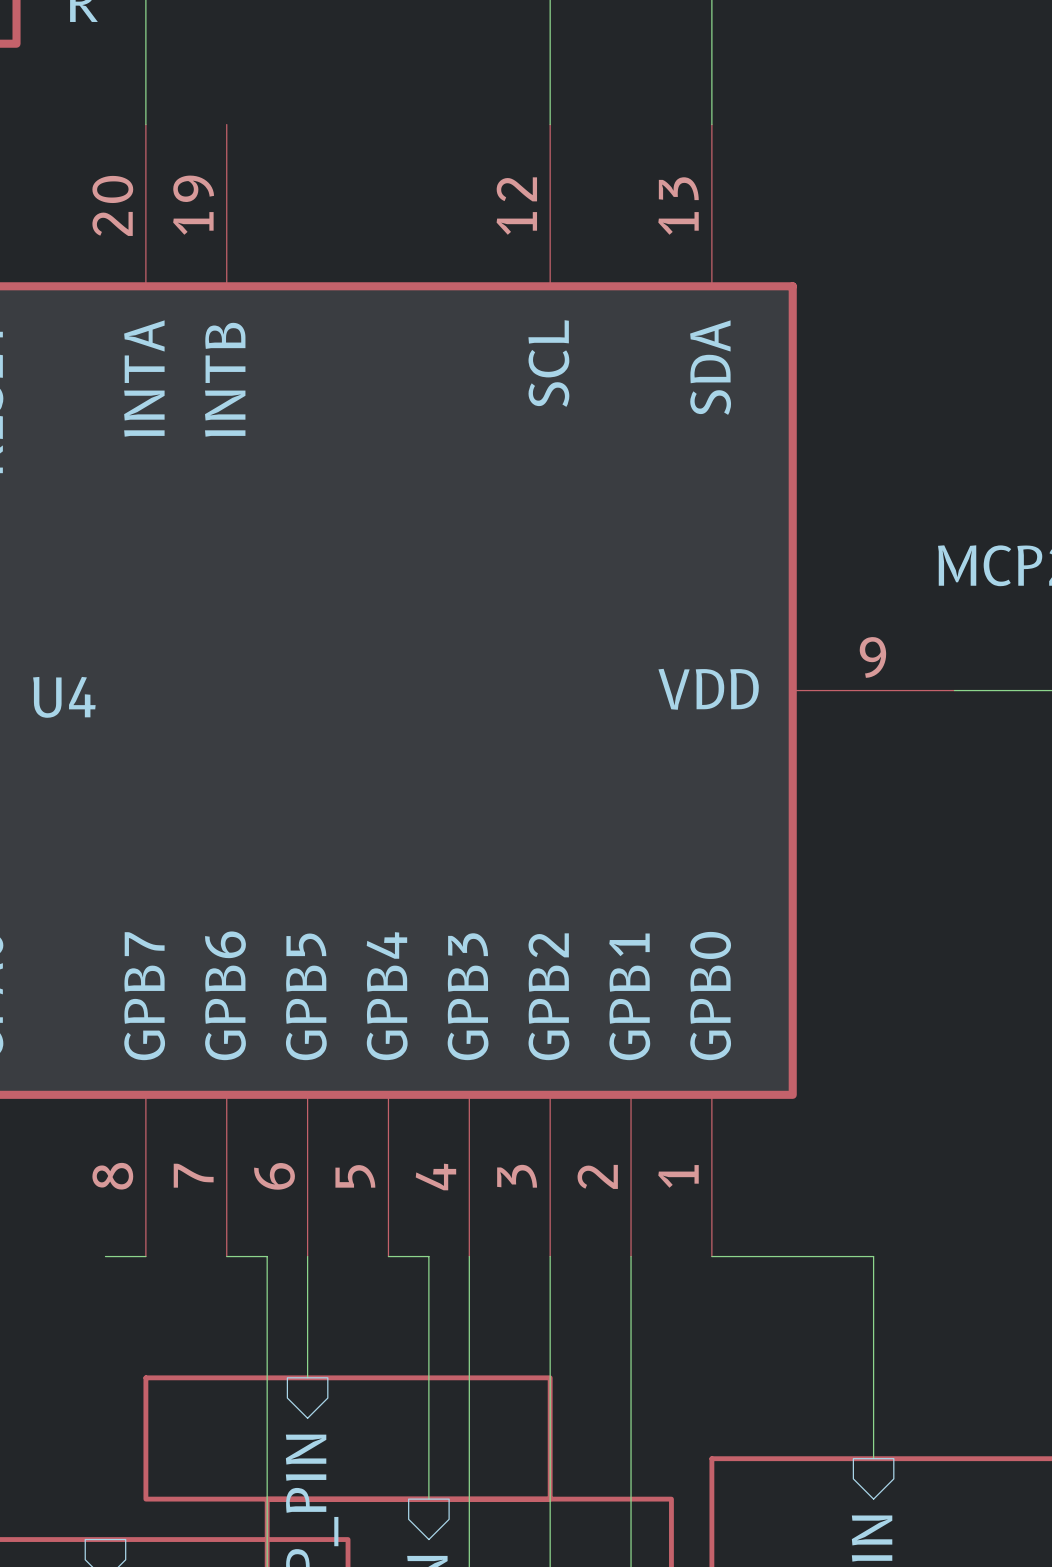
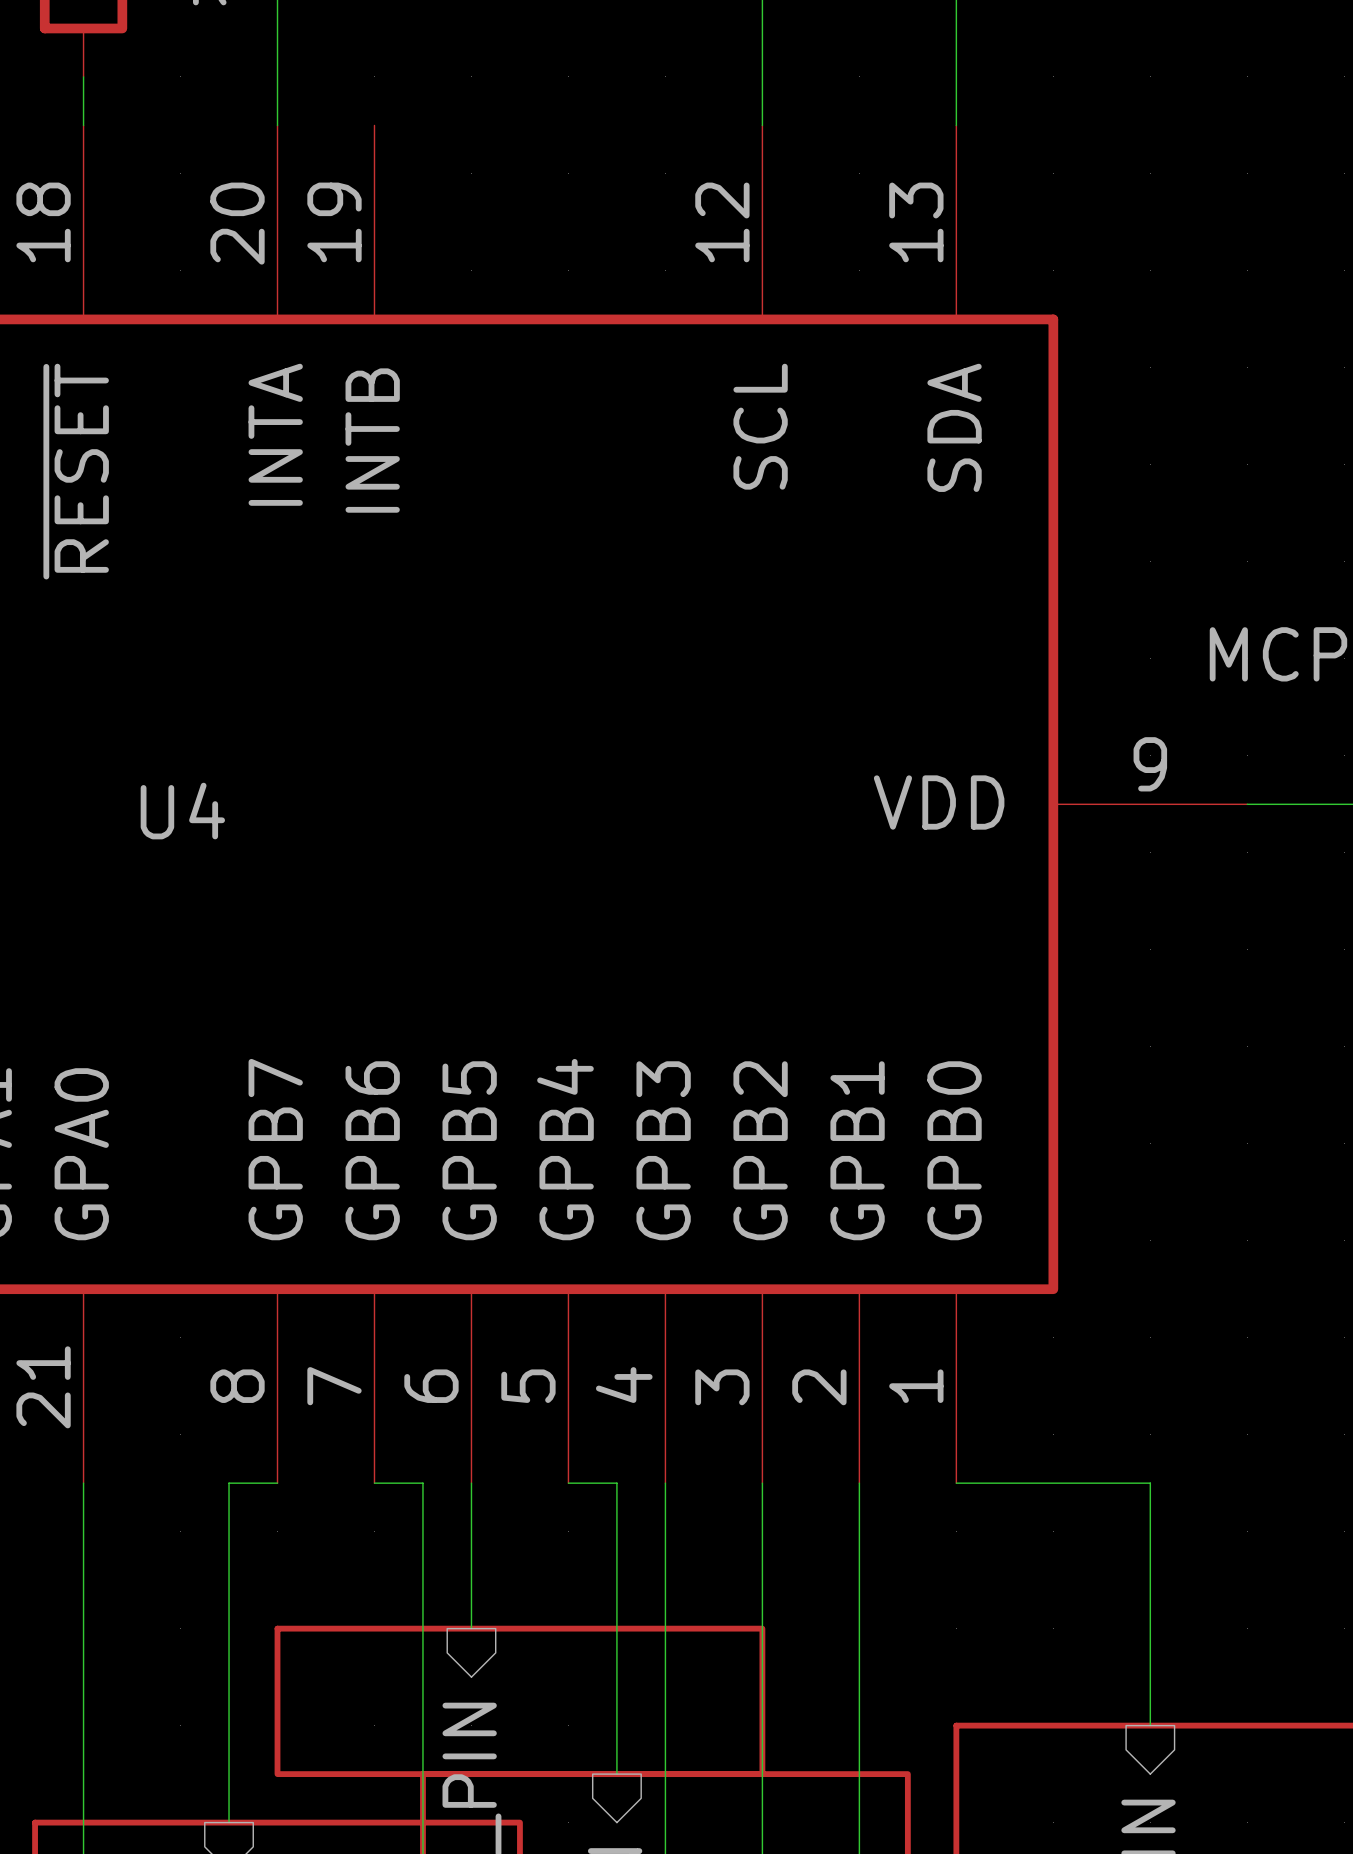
wire: none -> (229, 1483) (229, 1822)

